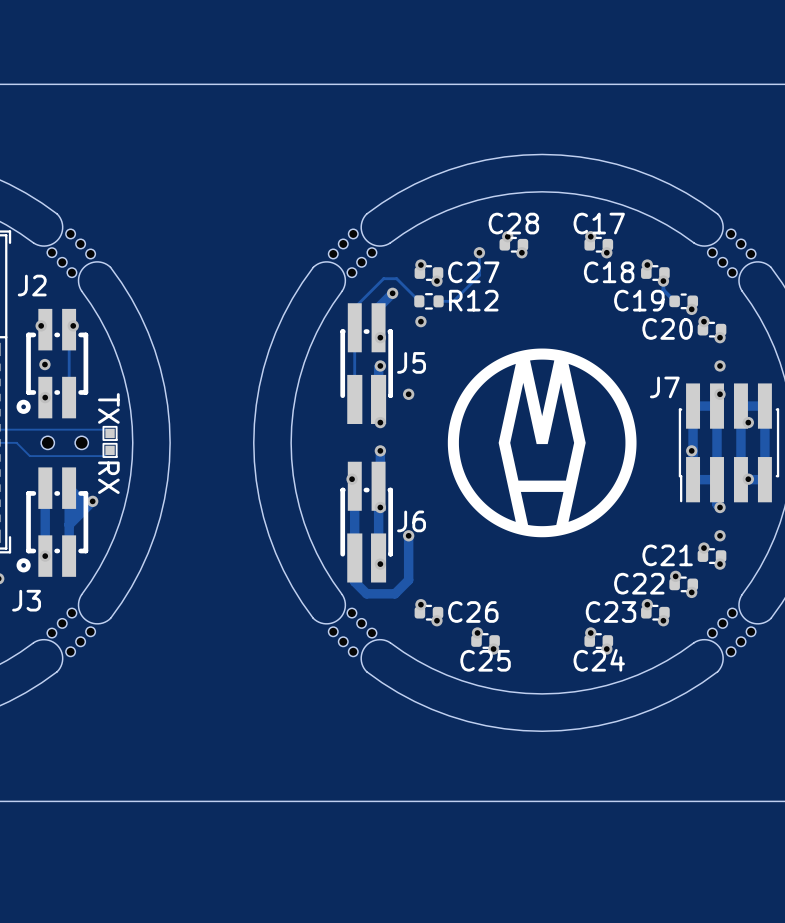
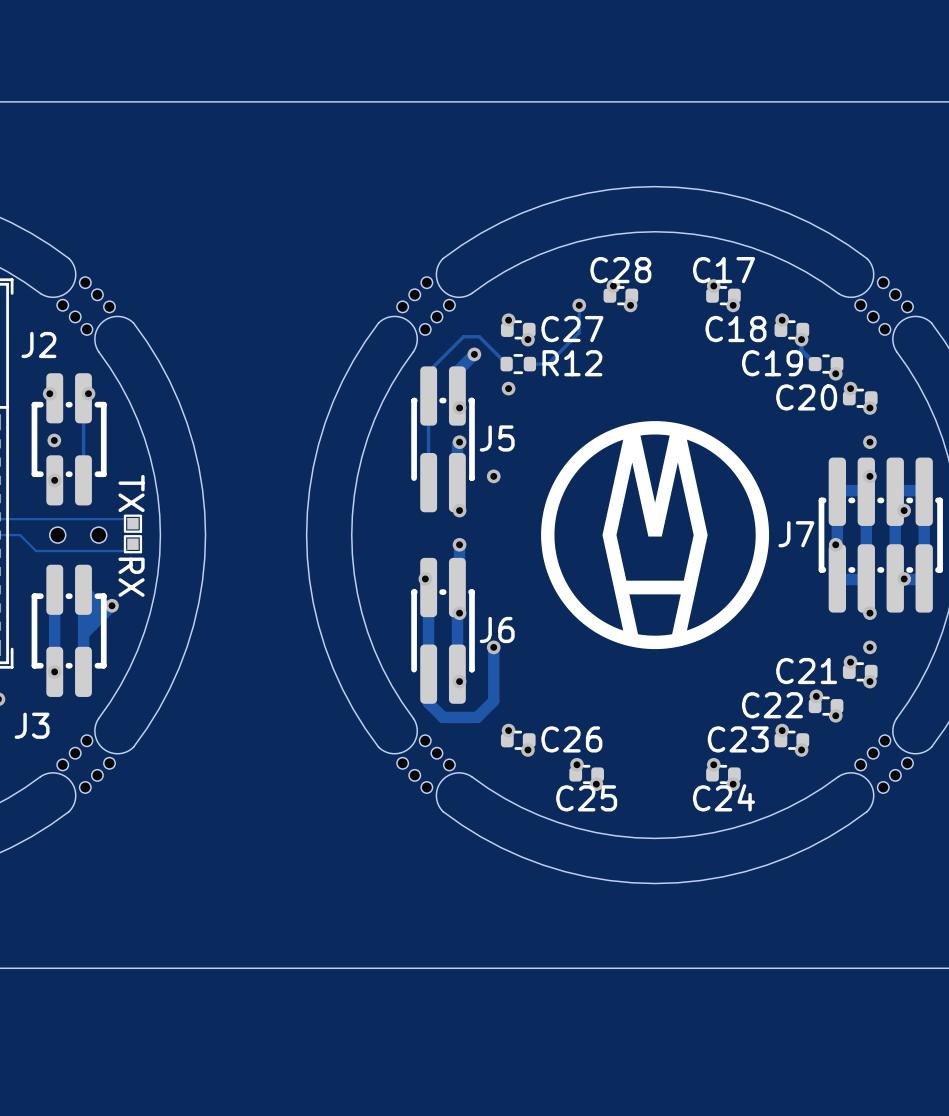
J5 footprint: [340, 303, 394, 424] -> [411, 366, 475, 513]
J2 footprint: [16, 308, 89, 419] -> [31, 373, 107, 506]
J7 footprint: [678, 383, 780, 503] -> [818, 457, 943, 613]
J7 name position: J7 (664, 387) -> J7 (796, 534)
J6 footprint: [340, 461, 394, 583] -> [411, 557, 475, 704]
J3 footprint: [16, 467, 89, 577] -> [31, 564, 107, 697]

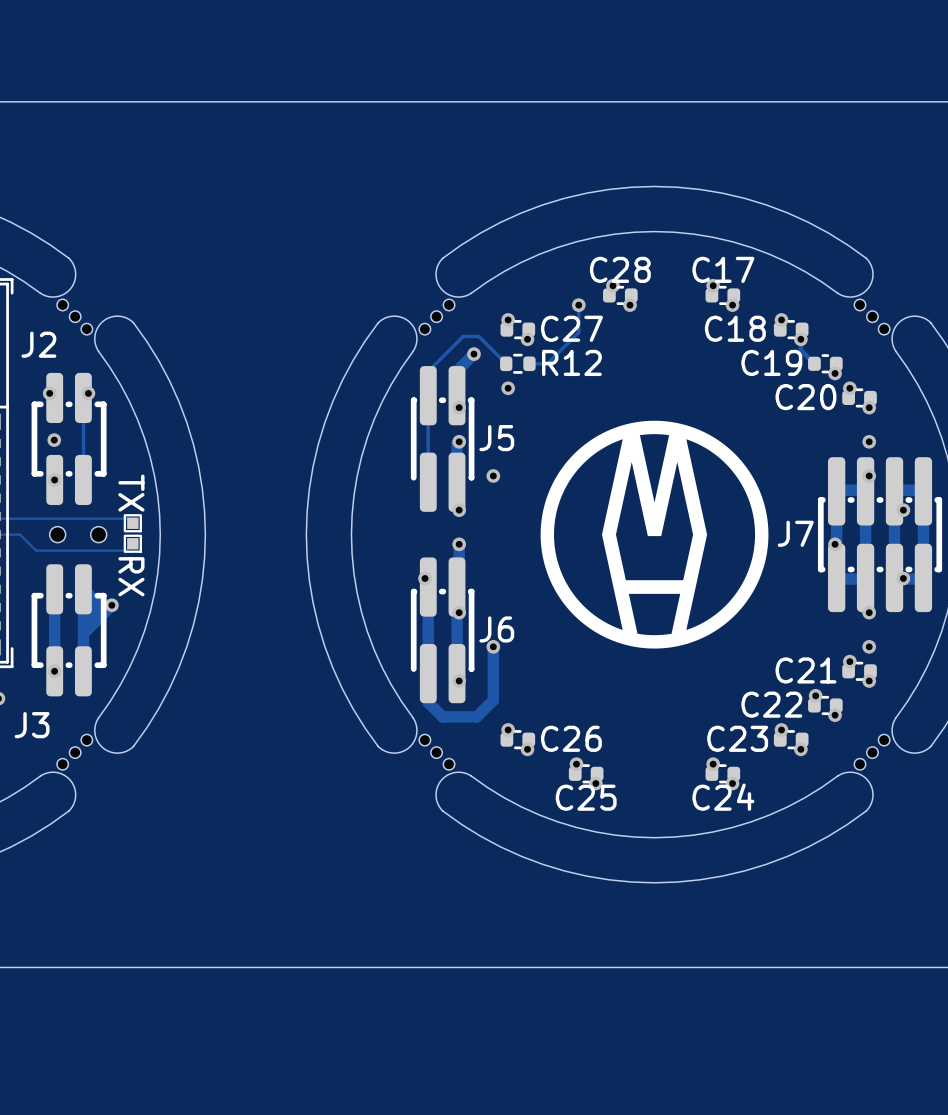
part footprint: [40, 258, 135, 353] -> [39, 257, 135, 352]
part footprint: [377, 258, 473, 353] -> [377, 257, 472, 352]
part footprint: [837, 258, 933, 353] -> [837, 257, 932, 352]
part footprint: [40, 718, 135, 813] -> [39, 717, 135, 812]
part footprint: [377, 718, 473, 813] -> [377, 717, 472, 812]
part footprint: [837, 718, 933, 813] -> [837, 717, 932, 812]

